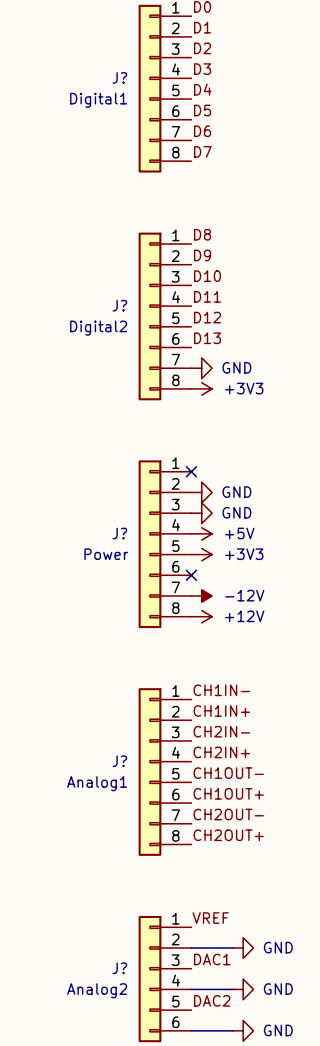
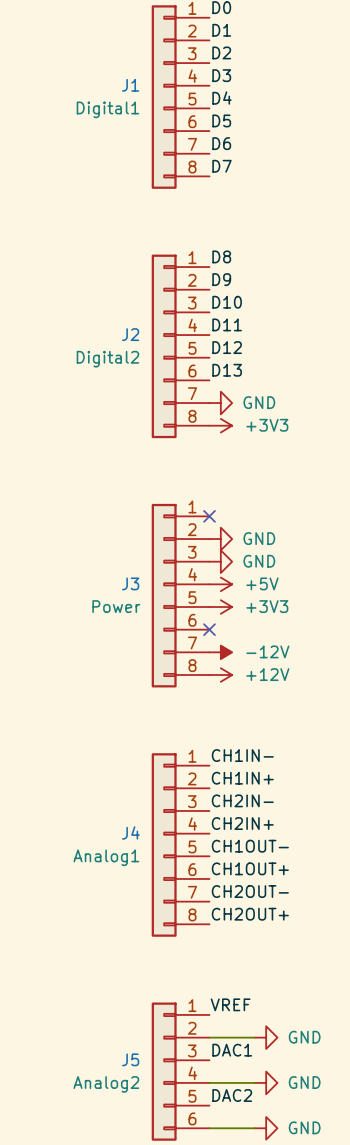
J? name: J? (119, 77) -> J1 (130, 85)
J? name: J? (119, 305) -> J2 (130, 334)
J? name: J? (119, 533) -> J3 (130, 583)
J? name: J? (119, 761) -> J4 (130, 832)
J? name: J? (119, 968) -> J5 (130, 1059)

